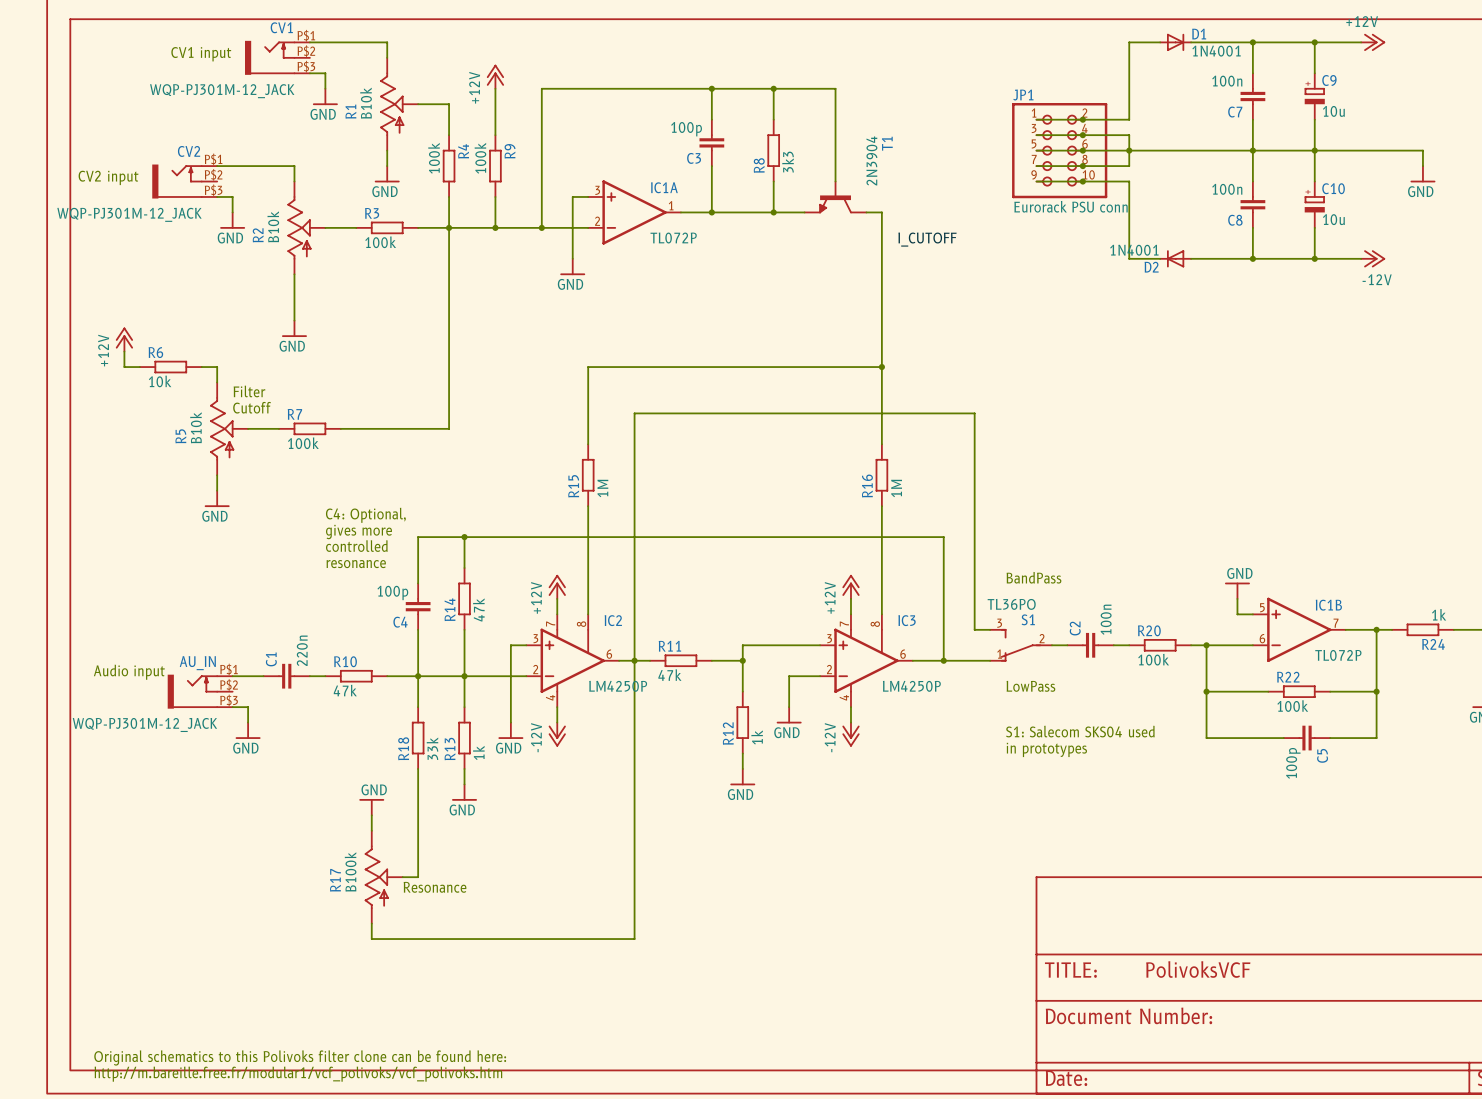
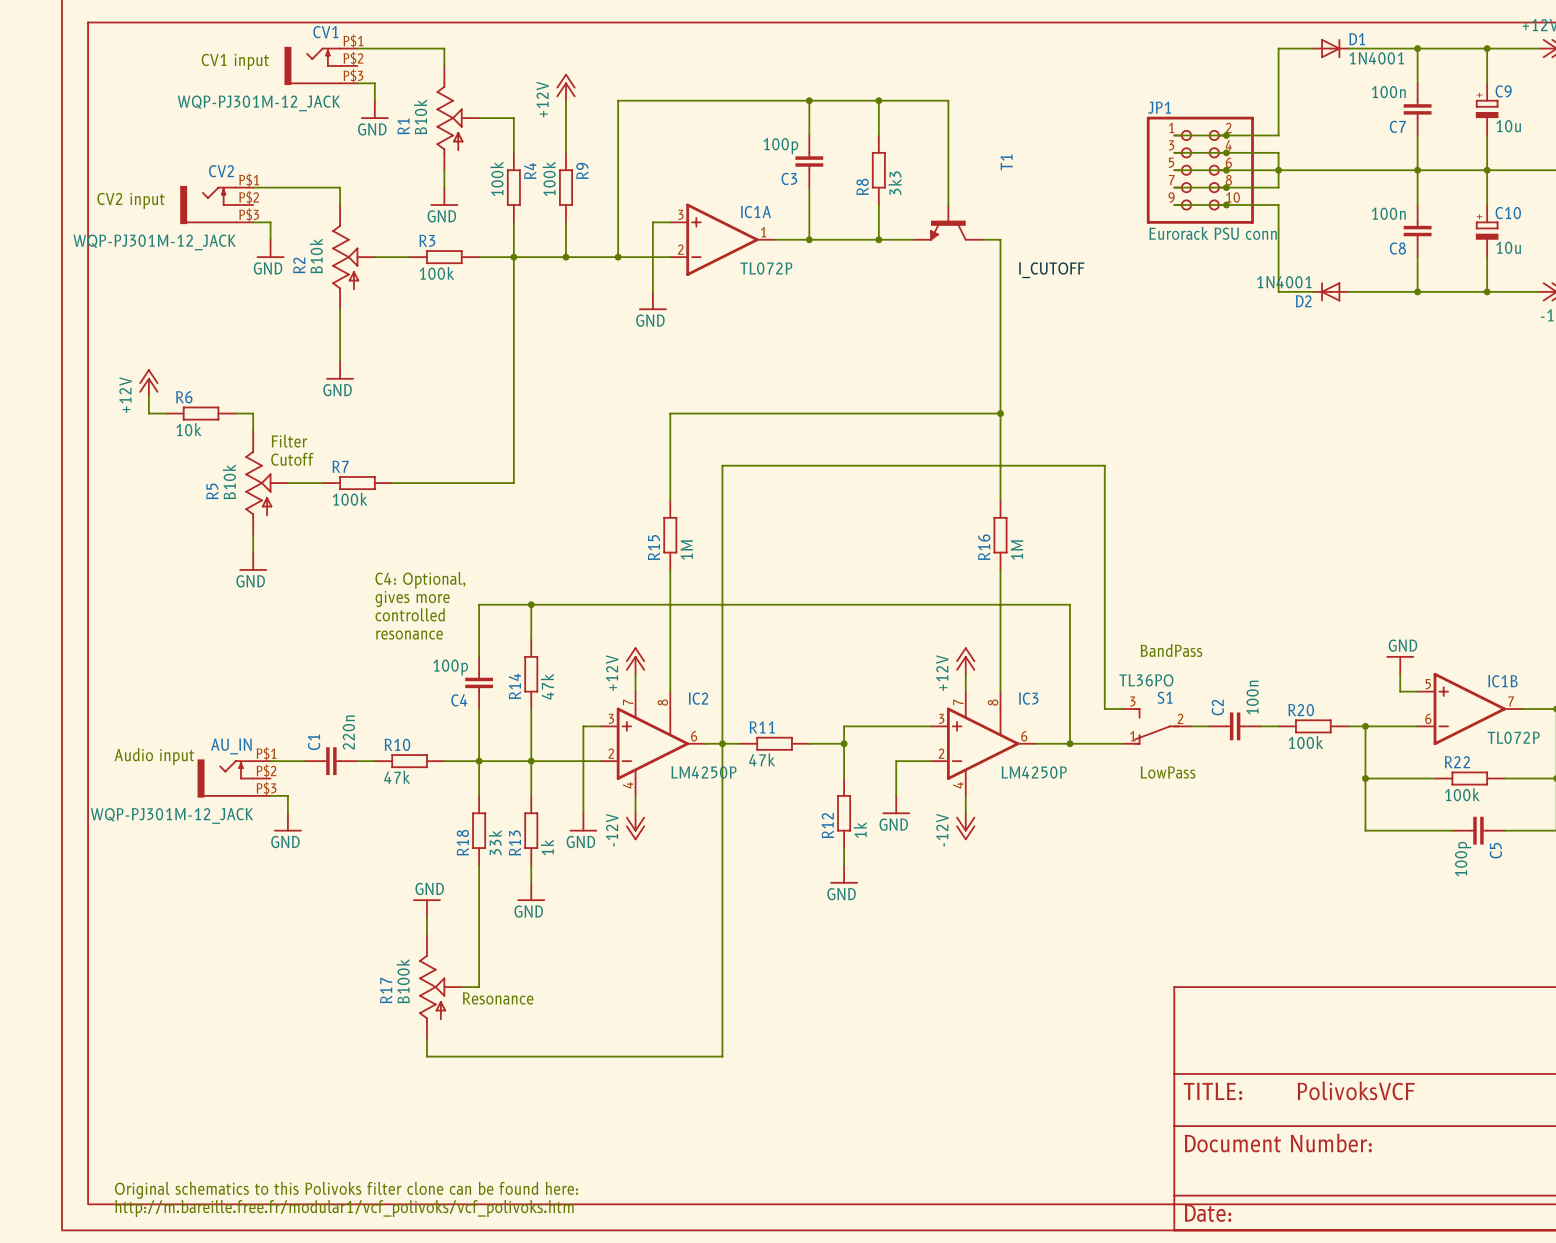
T1 value: 2N3904 (871, 160) -> none
text: S1: Salecom SKS04 used (1080, 731) -> none
text: in prototypes (1046, 749) -> none

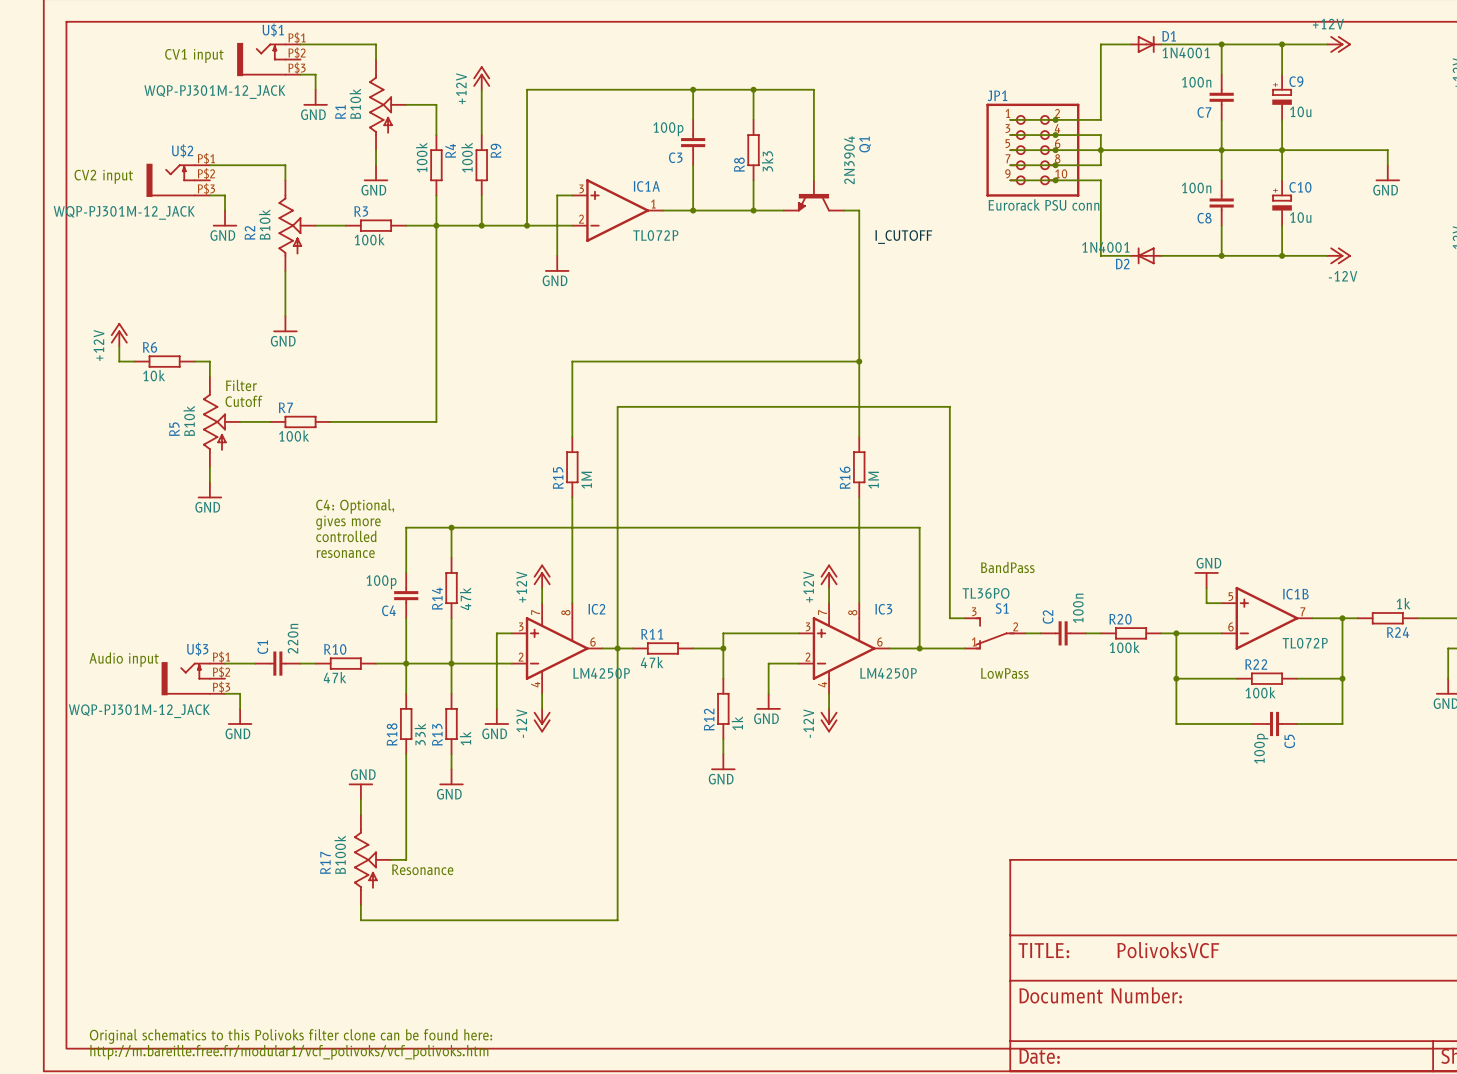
CV1 name: CV1 (325, 32) -> U$1 (273, 30)
T1 name: T1 (1006, 162) -> Q1 (865, 144)
CV2 name: CV2 (221, 171) -> U$2 (182, 150)
T1 value: none -> 2N3904 (849, 160)
AU_IN name: AU_IN (231, 746) -> U$3 (197, 649)

